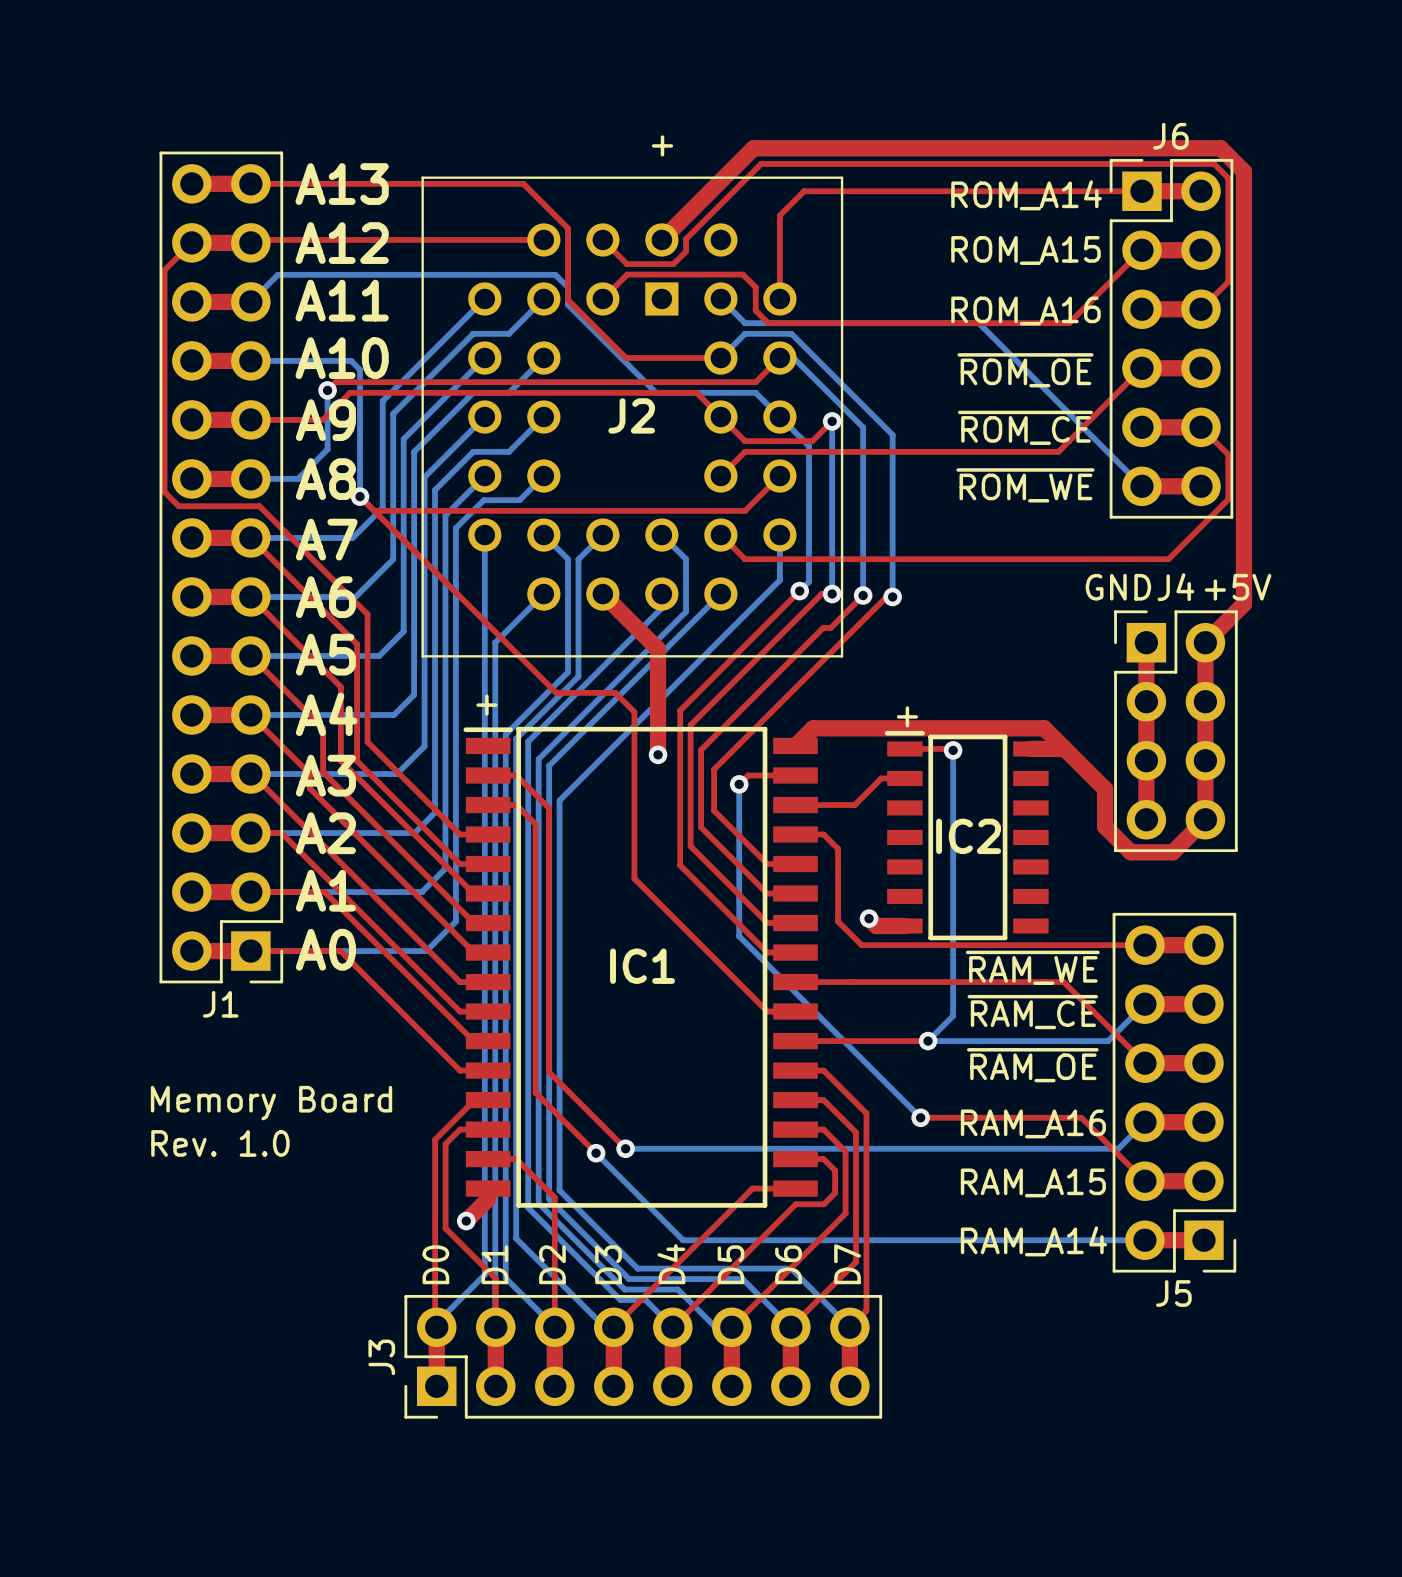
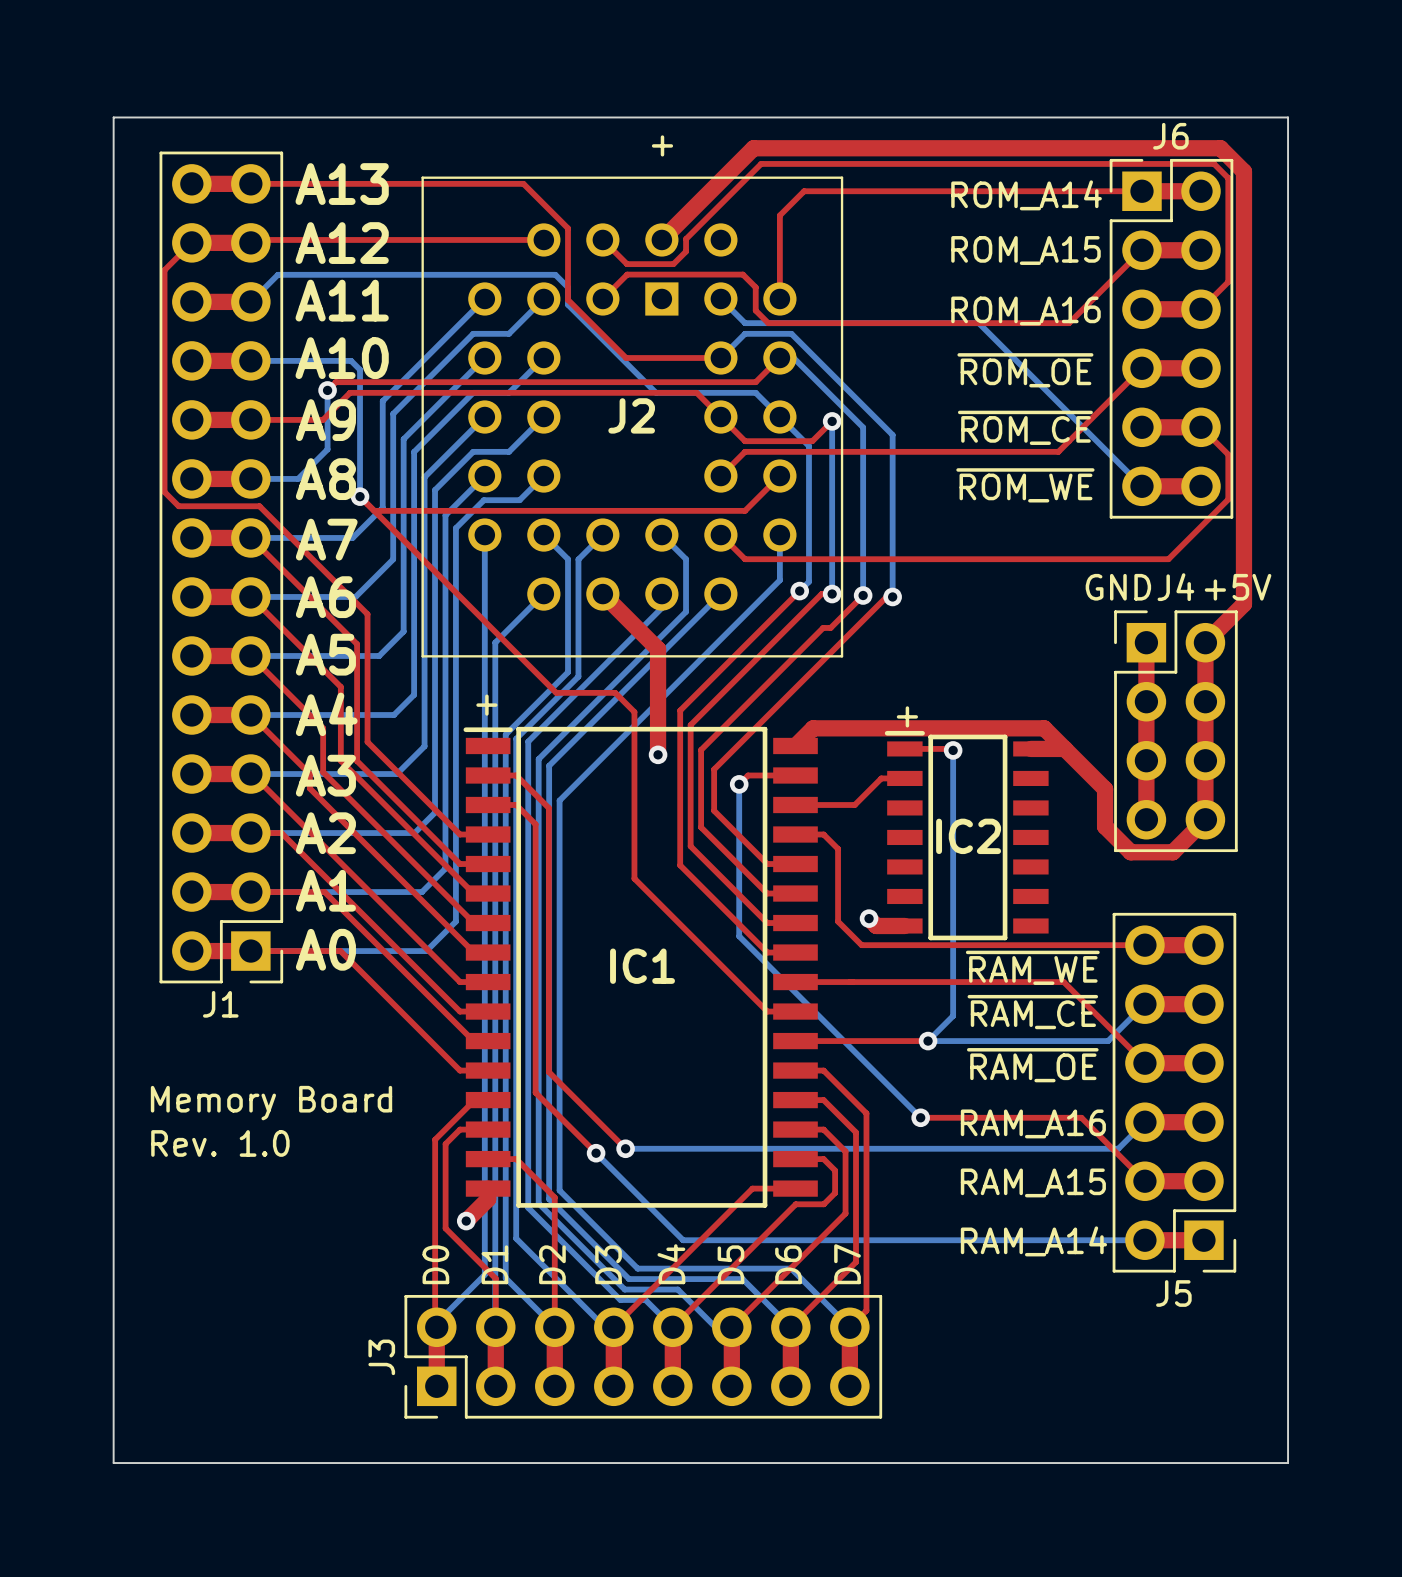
board edge: none -> (113, 117) (113, 1463) (1288, 1463) (1288, 117) (113, 117)

